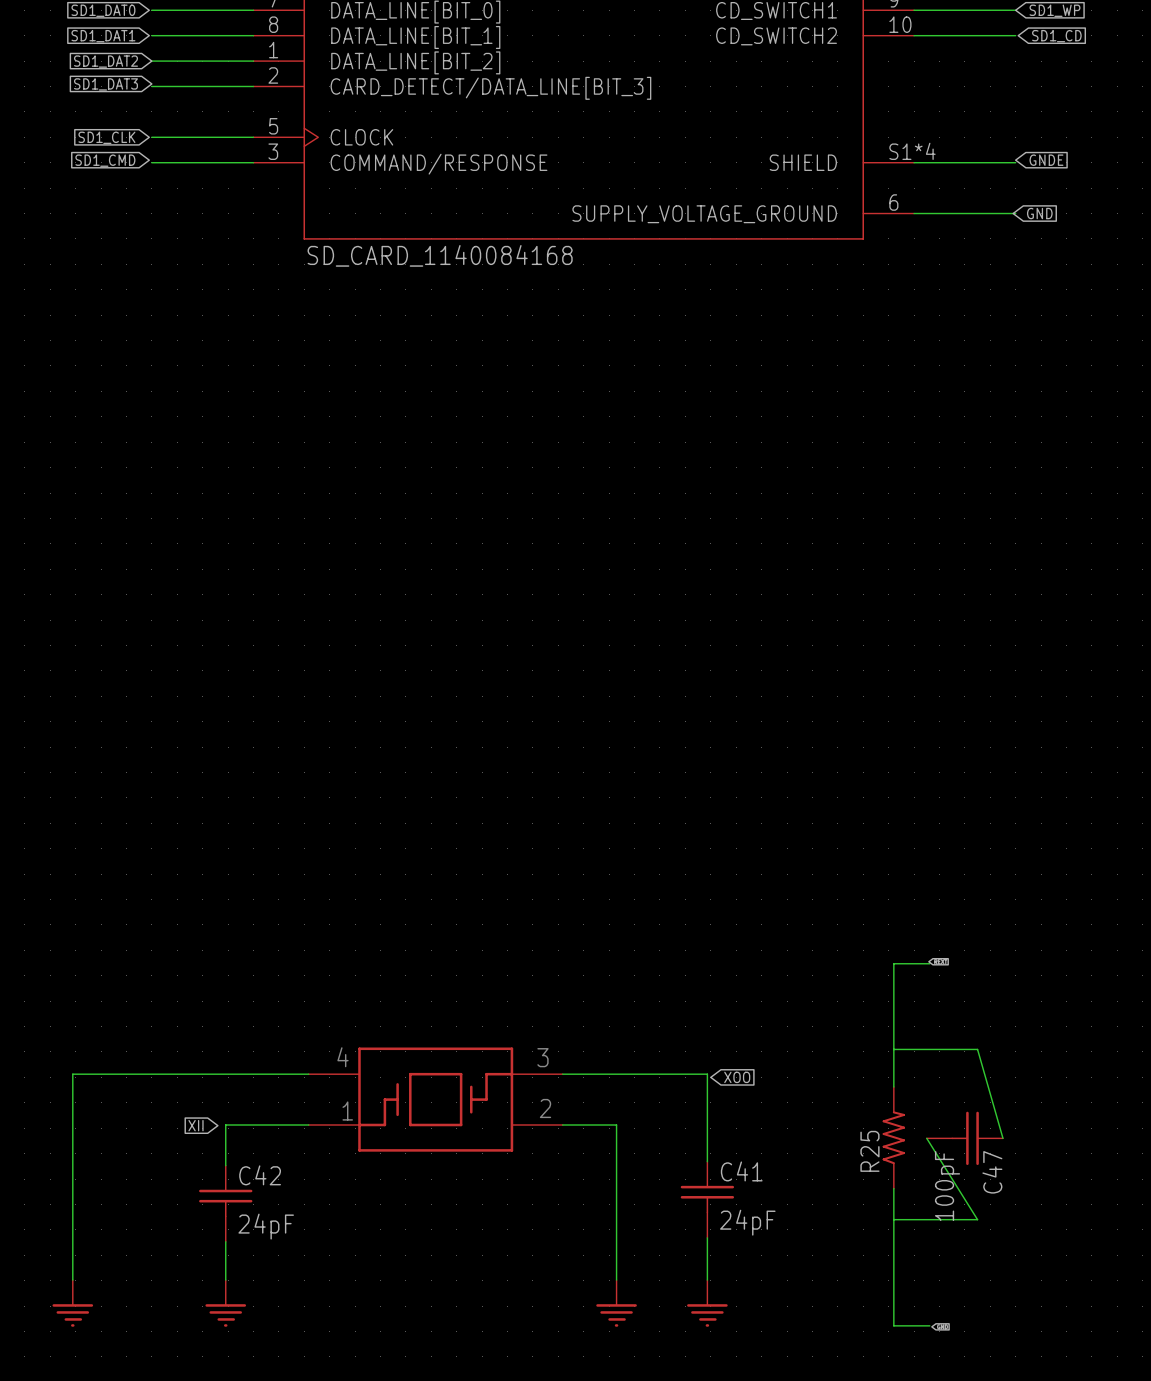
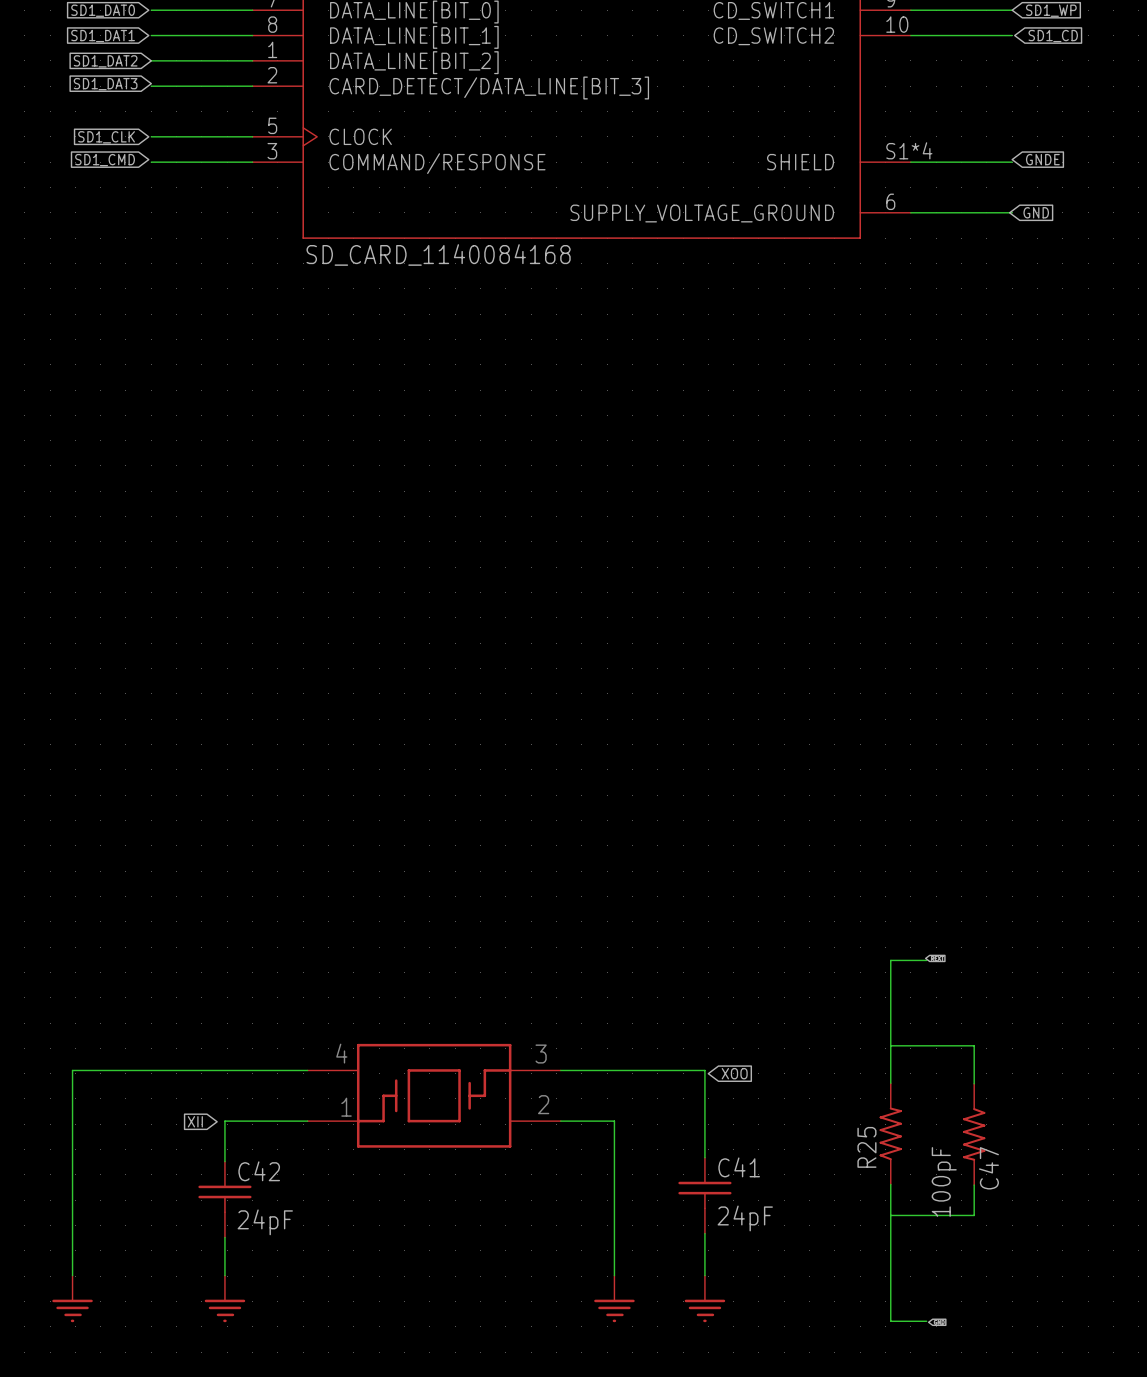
wire: (977, 1049) (1002, 1138) -> (974, 1045) (974, 1083)
C47 symbol: [926, 1111, 1003, 1166] -> [963, 1083, 986, 1186]
wire: (926, 1138) (977, 1219) -> (974, 1185) (974, 1215)

